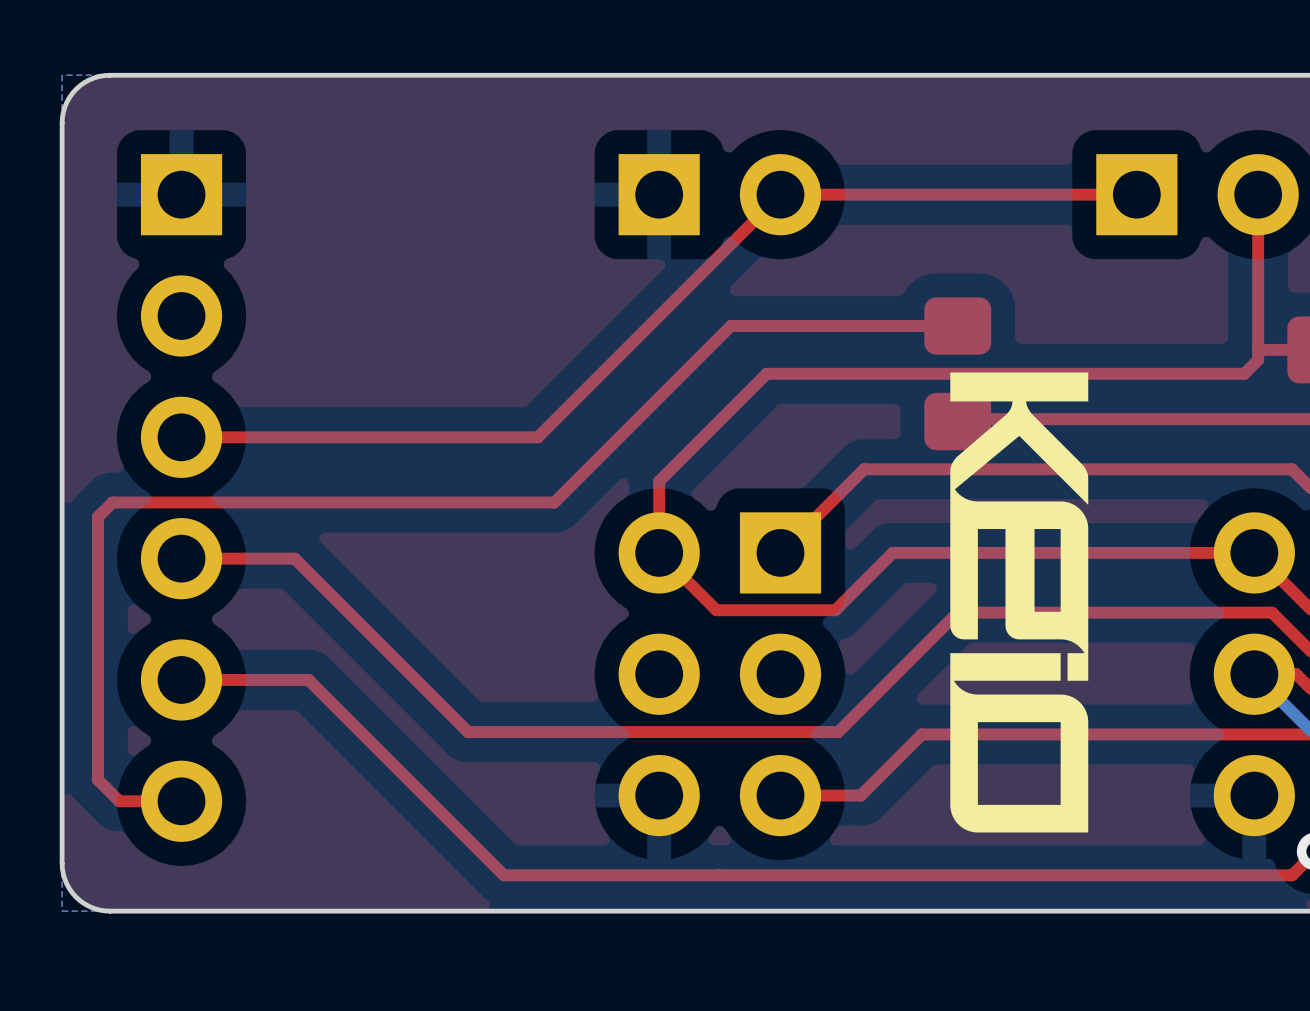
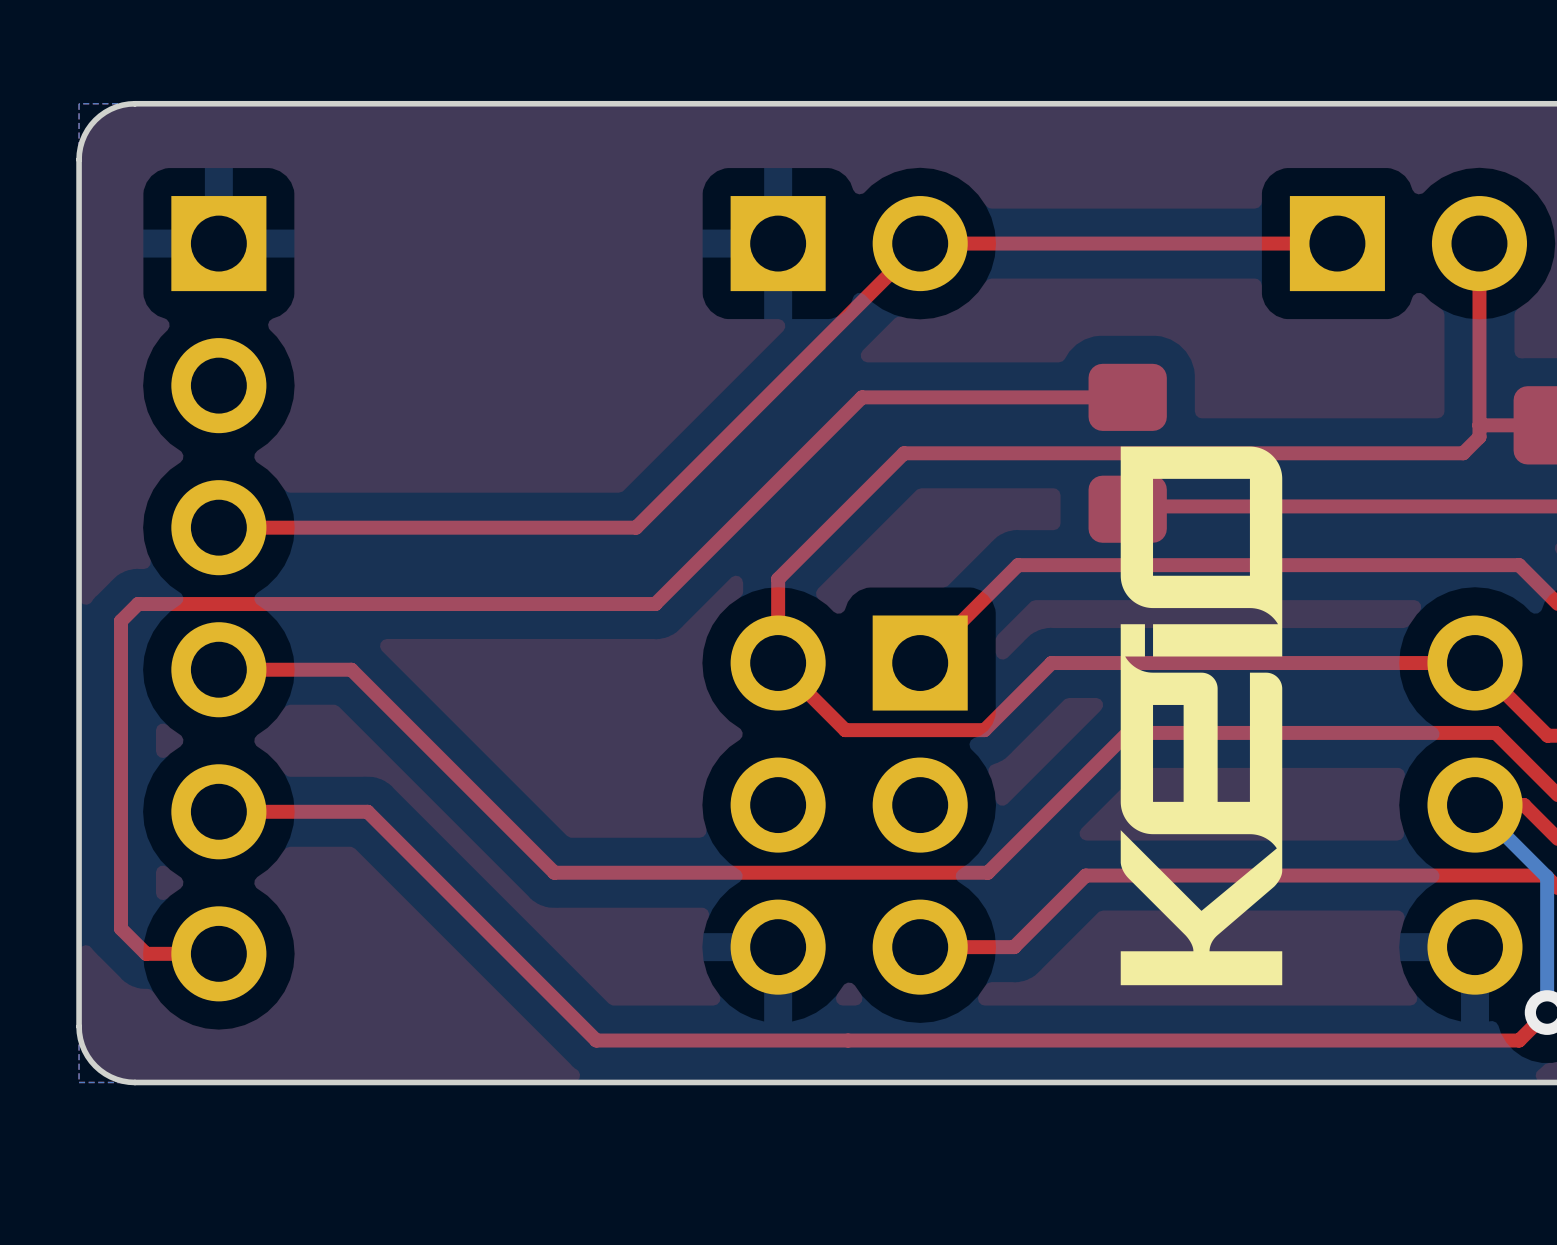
drawing: none -> [1120, 446, 1283, 986]
drawing: [950, 372, 1089, 833] -> none

